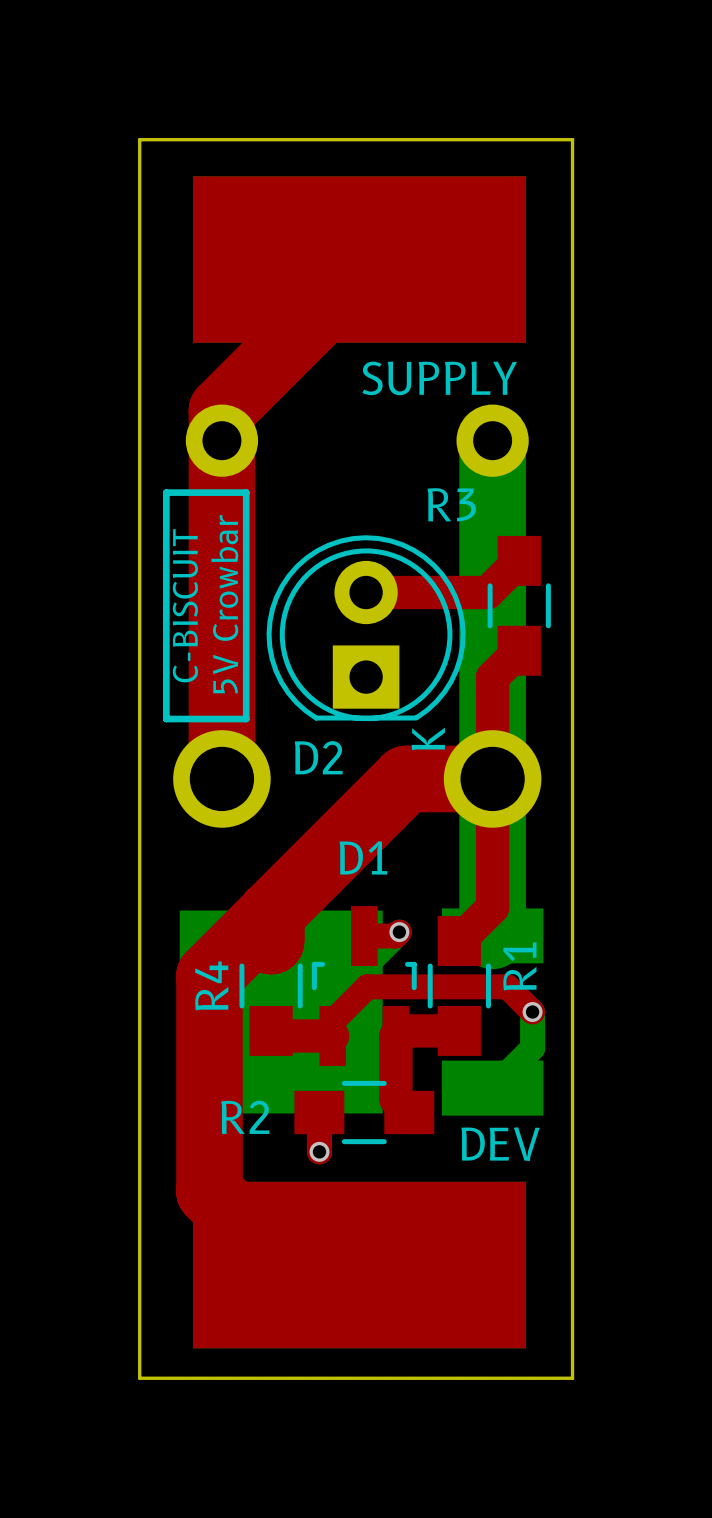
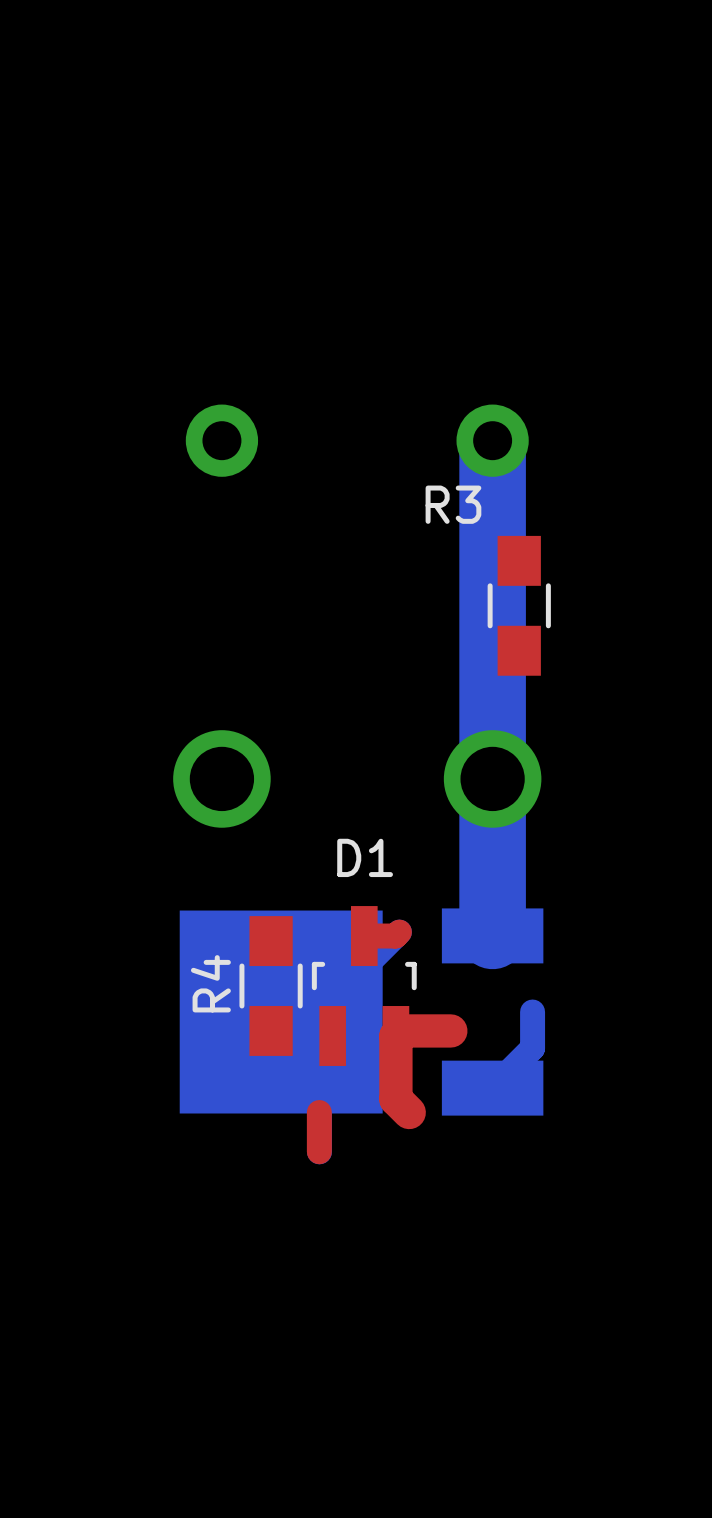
board edge: (139, 139) (139, 1378) (572, 1378) (572, 139) (139, 139) -> none
part: (359, 259) -> none
top track: (366, 266) (221, 410) (221, 778) -> none
text: SUPPLY (439, 378) -> none
line: (166, 492) (246, 492) (246, 719) (166, 719) (166, 492) -> none
top track: (519, 560) (487, 592) (366, 592) -> none
text: 5V Crowbar (224, 604) -> none
text: C-BISCUIT (185, 605) -> none
D2: (366, 628) -> none
top track: (519, 650) (492, 677) (492, 907) (459, 940) -> none
top track: (492, 778) (406, 778) (271, 914) (271, 941) -> none
top track: (271, 914) (209, 975) (209, 1191) (282, 1265) (366, 1265) -> none
via: (399, 932) -> none
R1: (459, 986) -> none
top track: (532, 1012) (507, 986) (367, 986) (332, 1021) (332, 1035) (276, 1035) (271, 1030) -> none
via: (532, 1012) -> none
R2: (364, 1112) -> none
text: DEV (500, 1144) -> none
via: (319, 1151) -> none
part: (359, 1265) -> none

